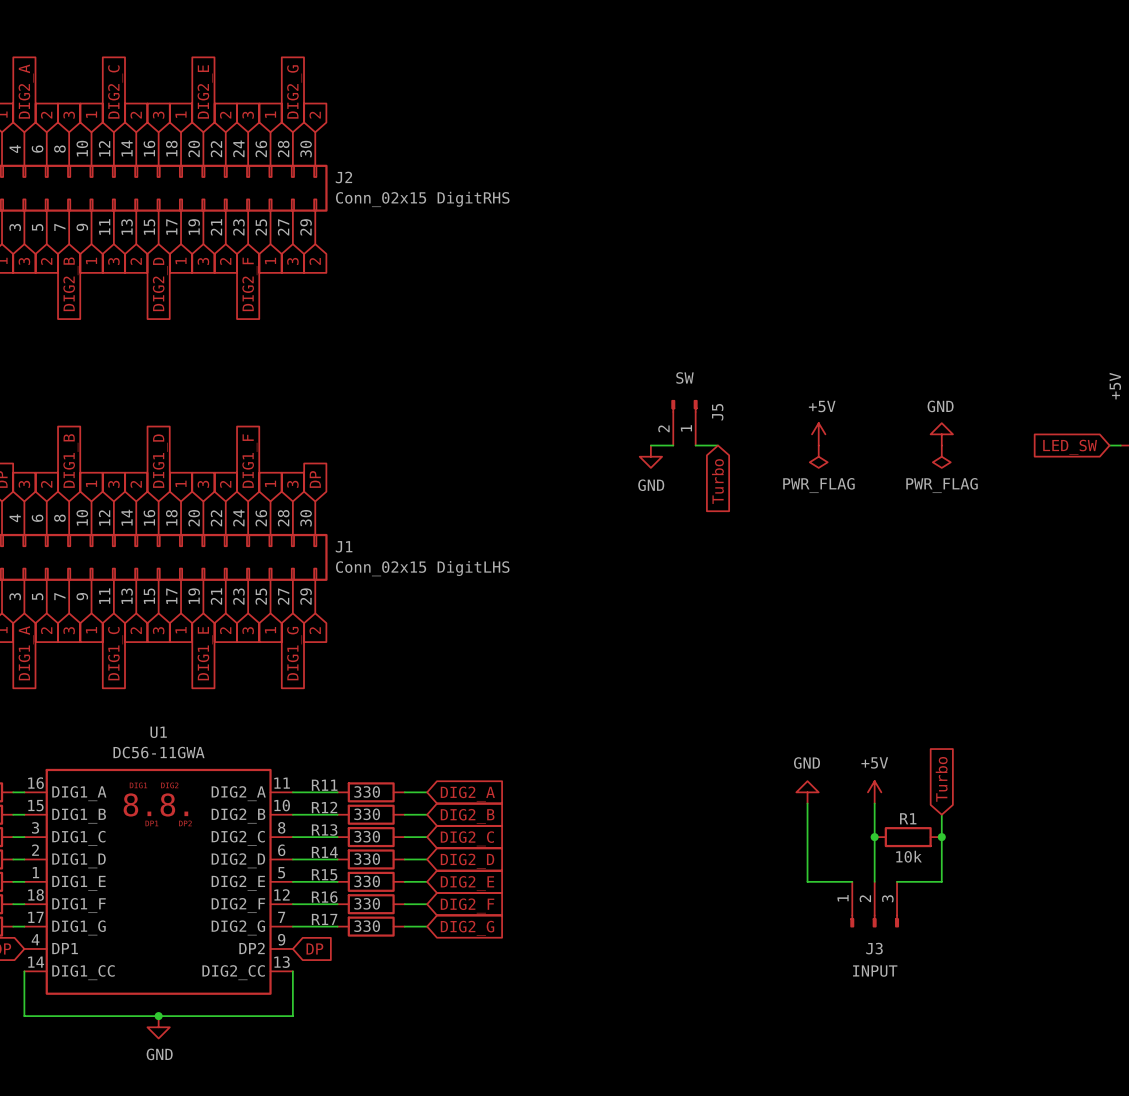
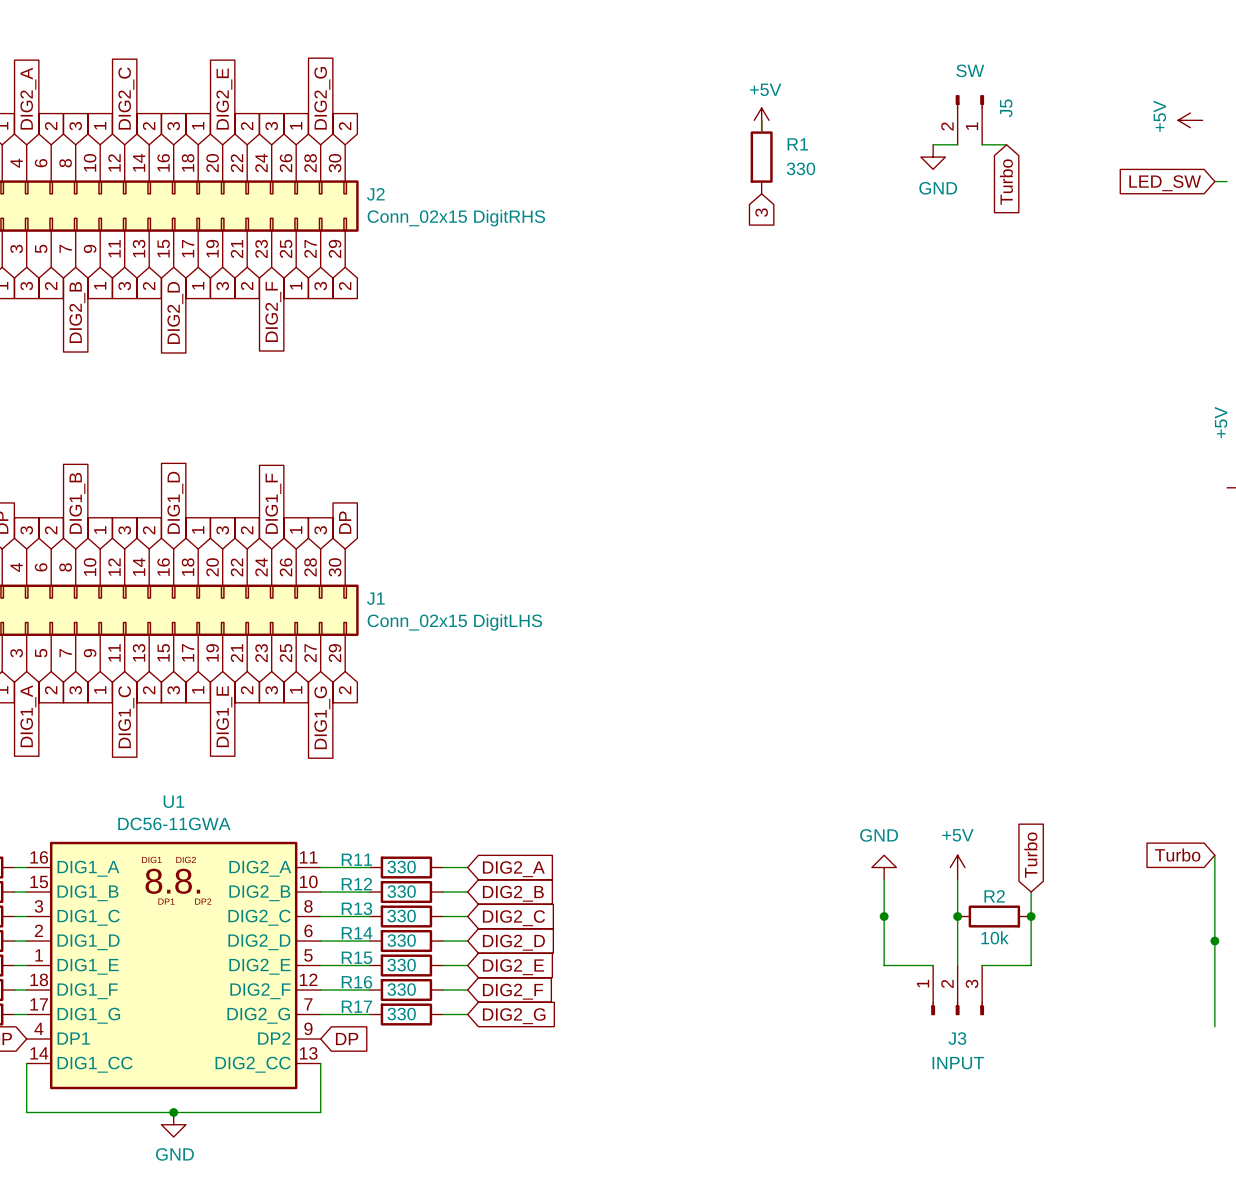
wire: none -> (761, 120) (761, 132)
power symbol: none -> +5V (761, 120)
power symbol: none -> +5V (1190, 120)
wire: none -> (933, 144) (957, 144)
wire: none -> (982, 144) (1006, 144)
R1: none -> 330 (761, 157)
power symbol: none -> GND (933, 157)
wire: none -> (1214, 181) (1227, 181)
global label: none -> LED_SW (1165, 183)
global label: none -> Turbo (1006, 182)
global label: none -> 3 (761, 212)
J5 position: (684, 422) -> (969, 119)
power symbol: +5V (818, 434) -> none
power symbol: GND (941, 434) -> none
wire: (650, 445) (673, 445) -> none
wire: (695, 445) (718, 445) -> none
wire: (1109, 445) (1120, 445) -> none
global label: LED_SW (1070, 447) -> none
power symbol: GND (650, 456) -> none
power symbol: PWR_FLAG (818, 456) -> none
power symbol: PWR_FLAG (941, 456) -> none
global label: Turbo (717, 481) -> none
global label: none -> Turbo (1177, 855)
wire: none -> (1214, 855) (1214, 1026)
R1 name: R1 (908, 818) -> R2 (994, 896)
junction: none -> (884, 916)
junction: none -> (1214, 941)

